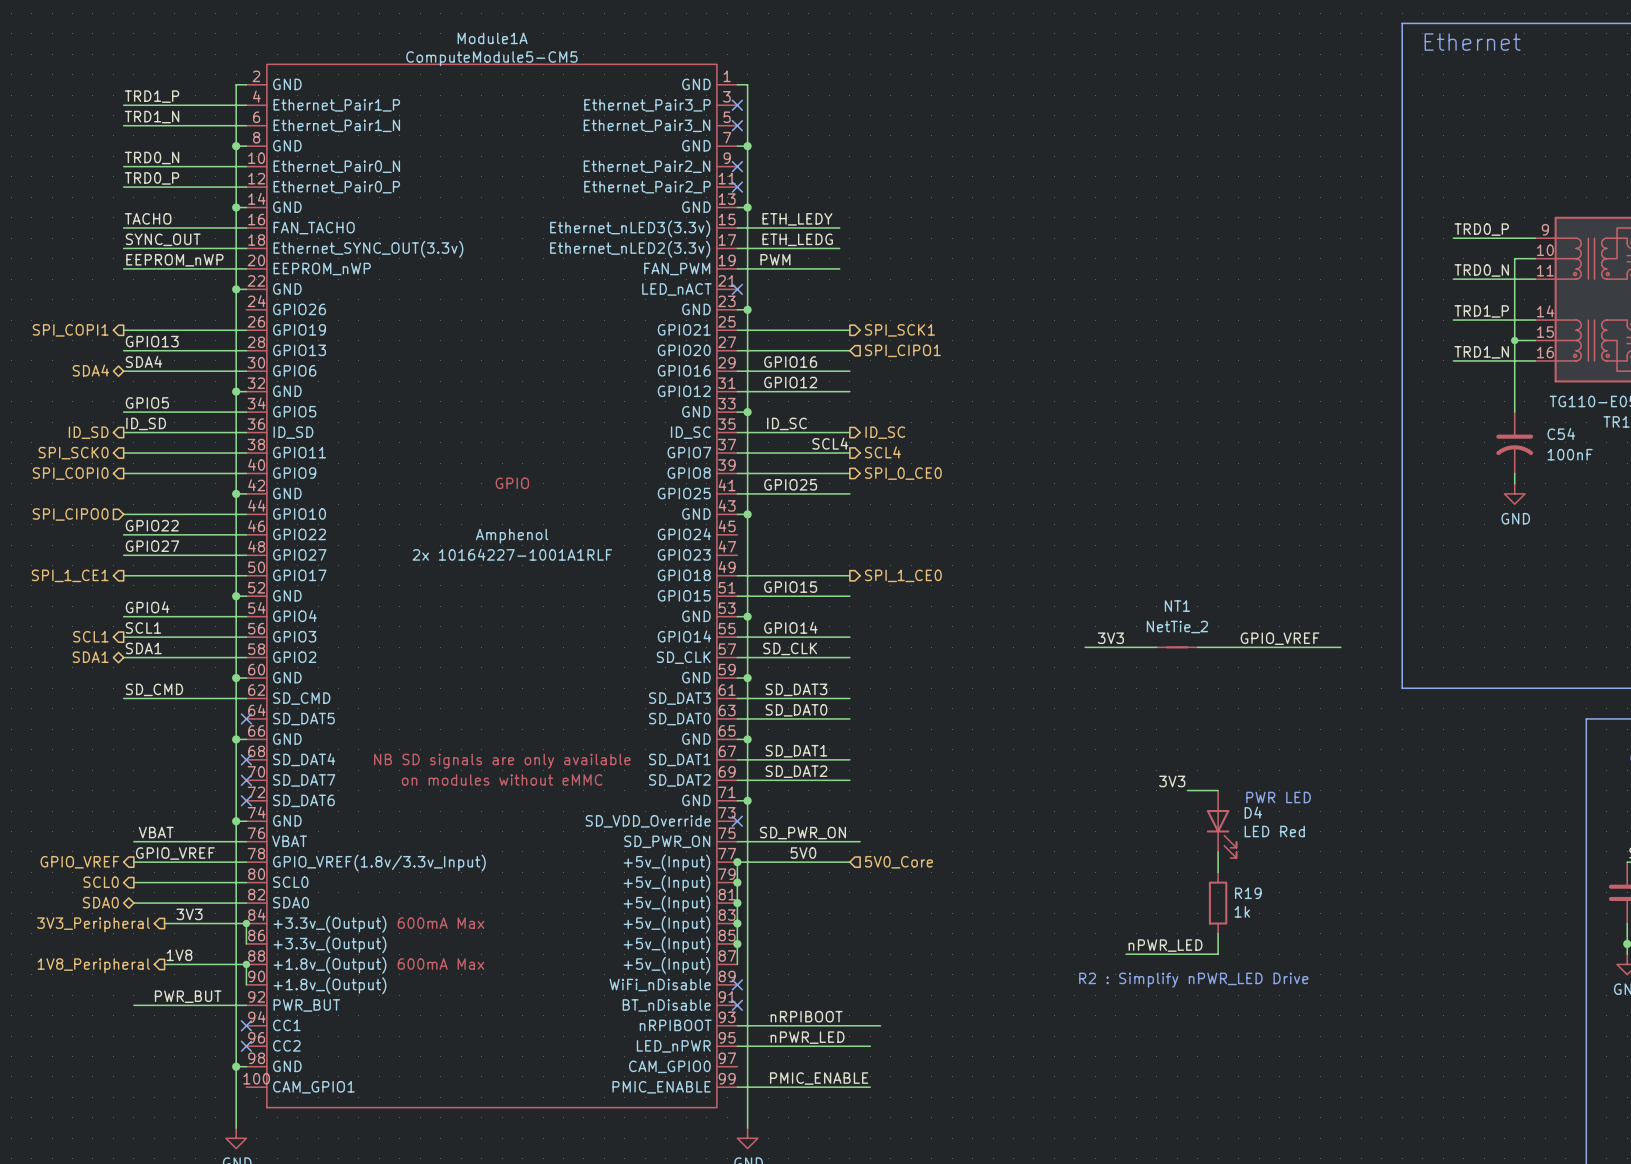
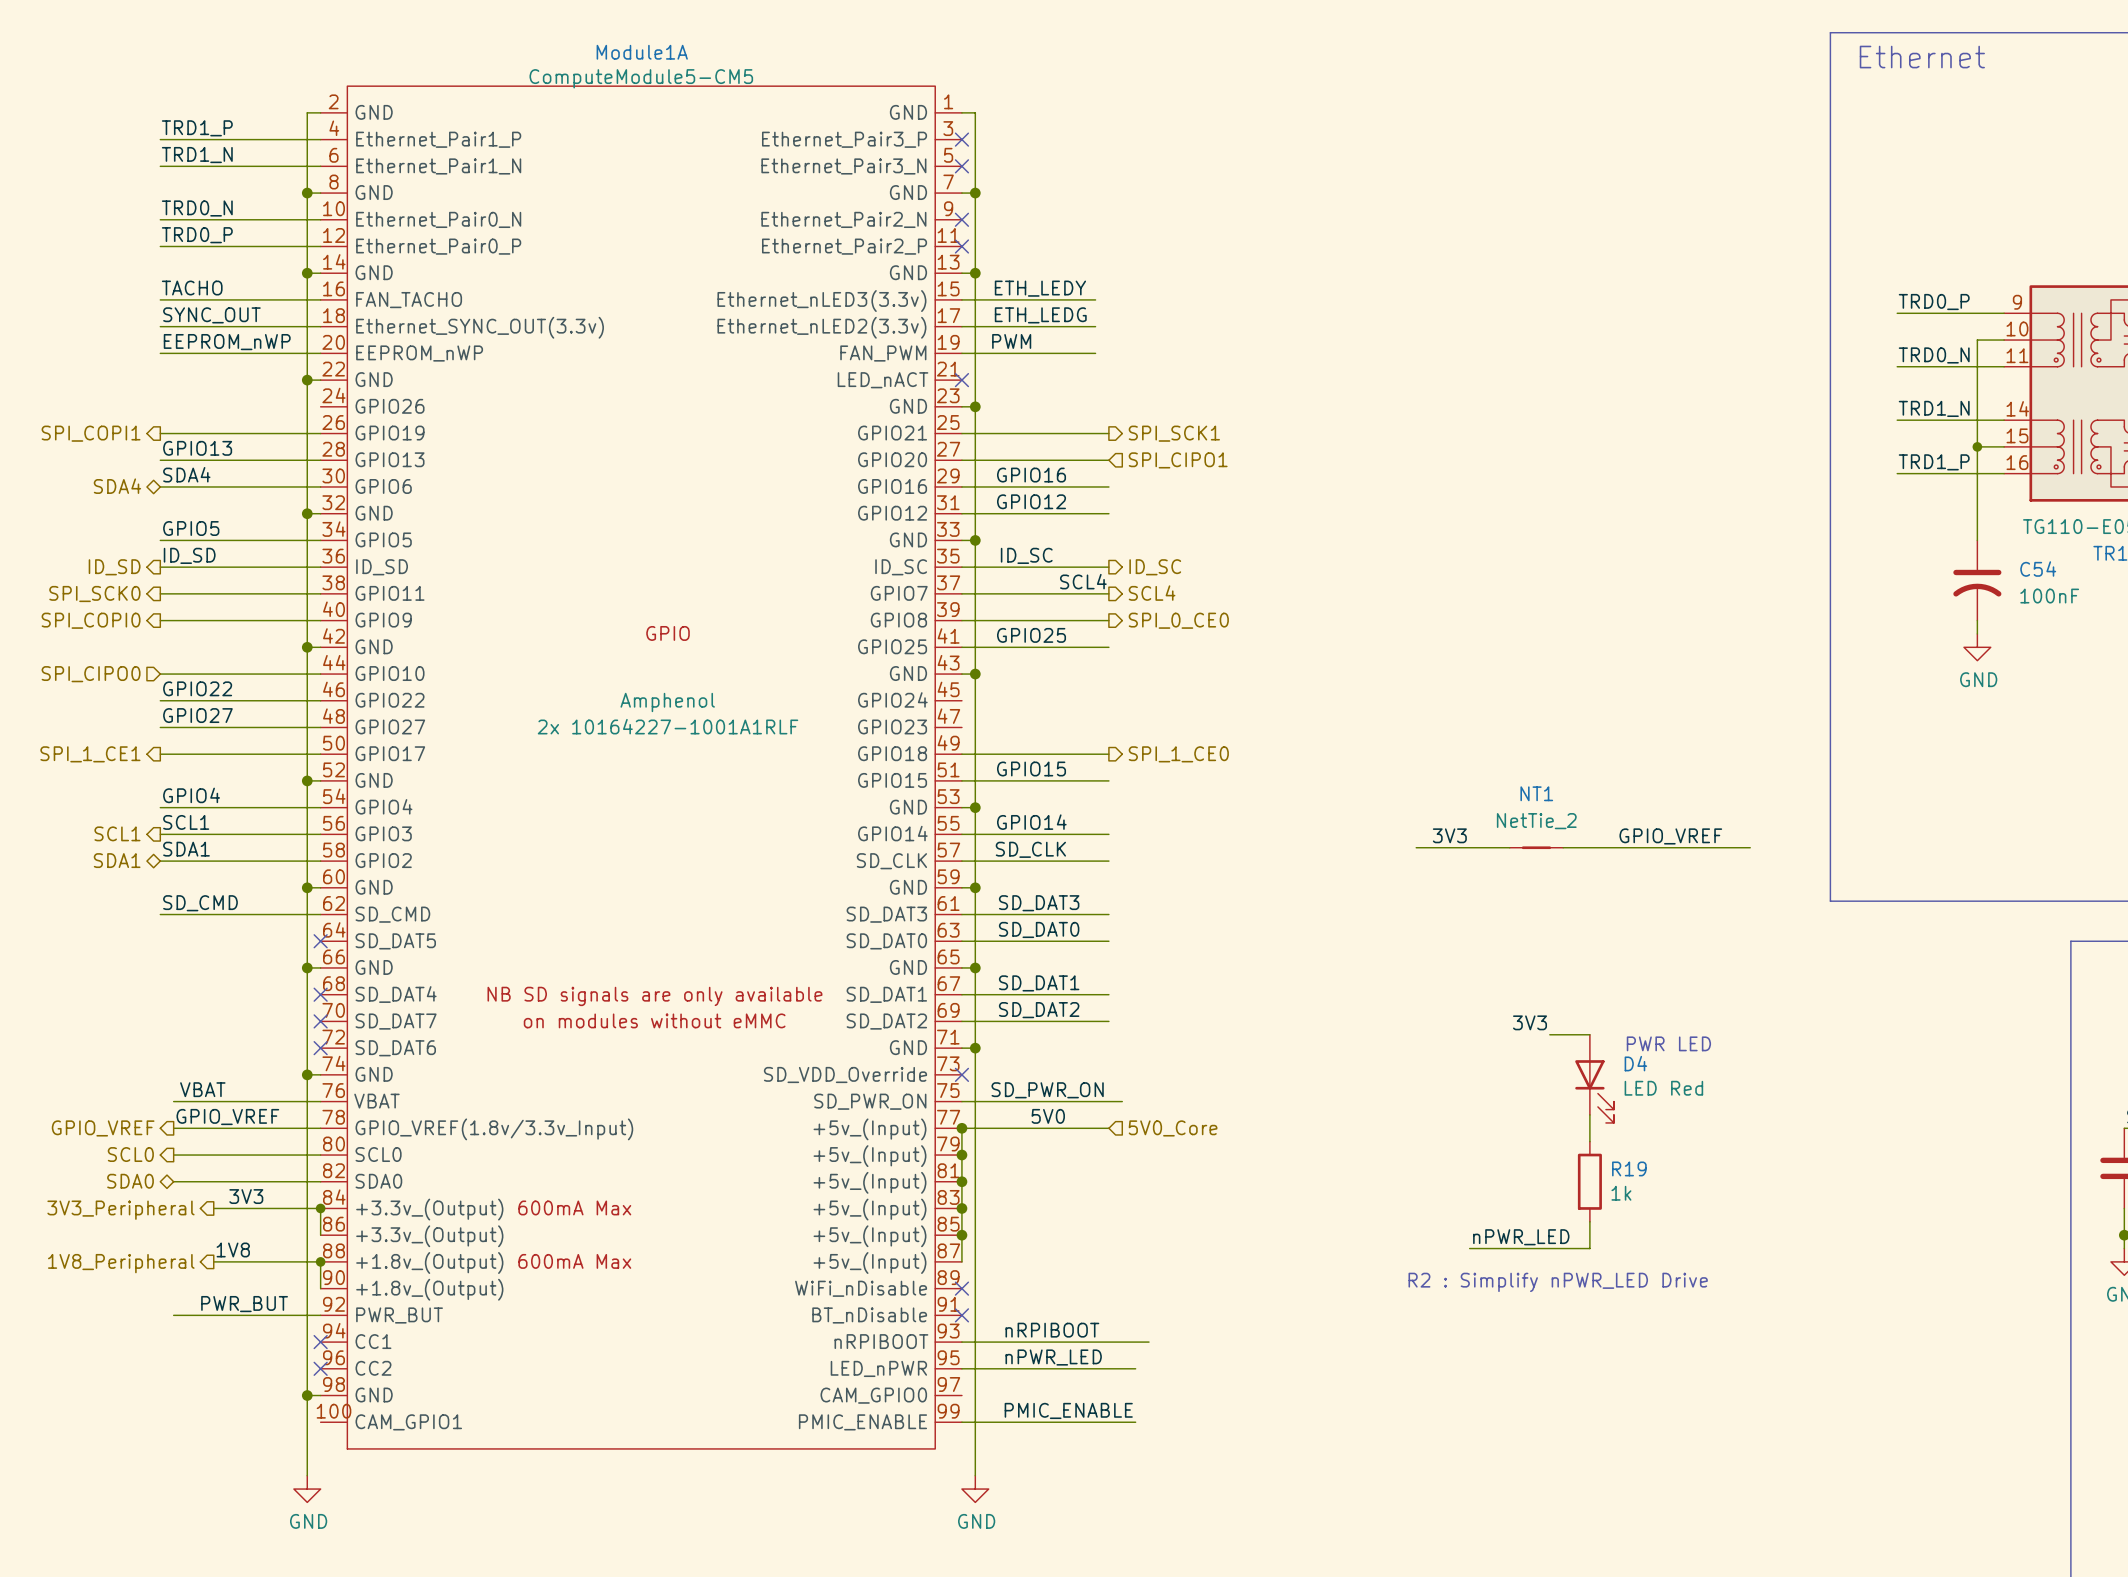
label: TRD1_P (1481, 311) -> TRD1_N (1934, 408)
label: TRD1_N (1481, 352) -> TRD1_P (1934, 462)

